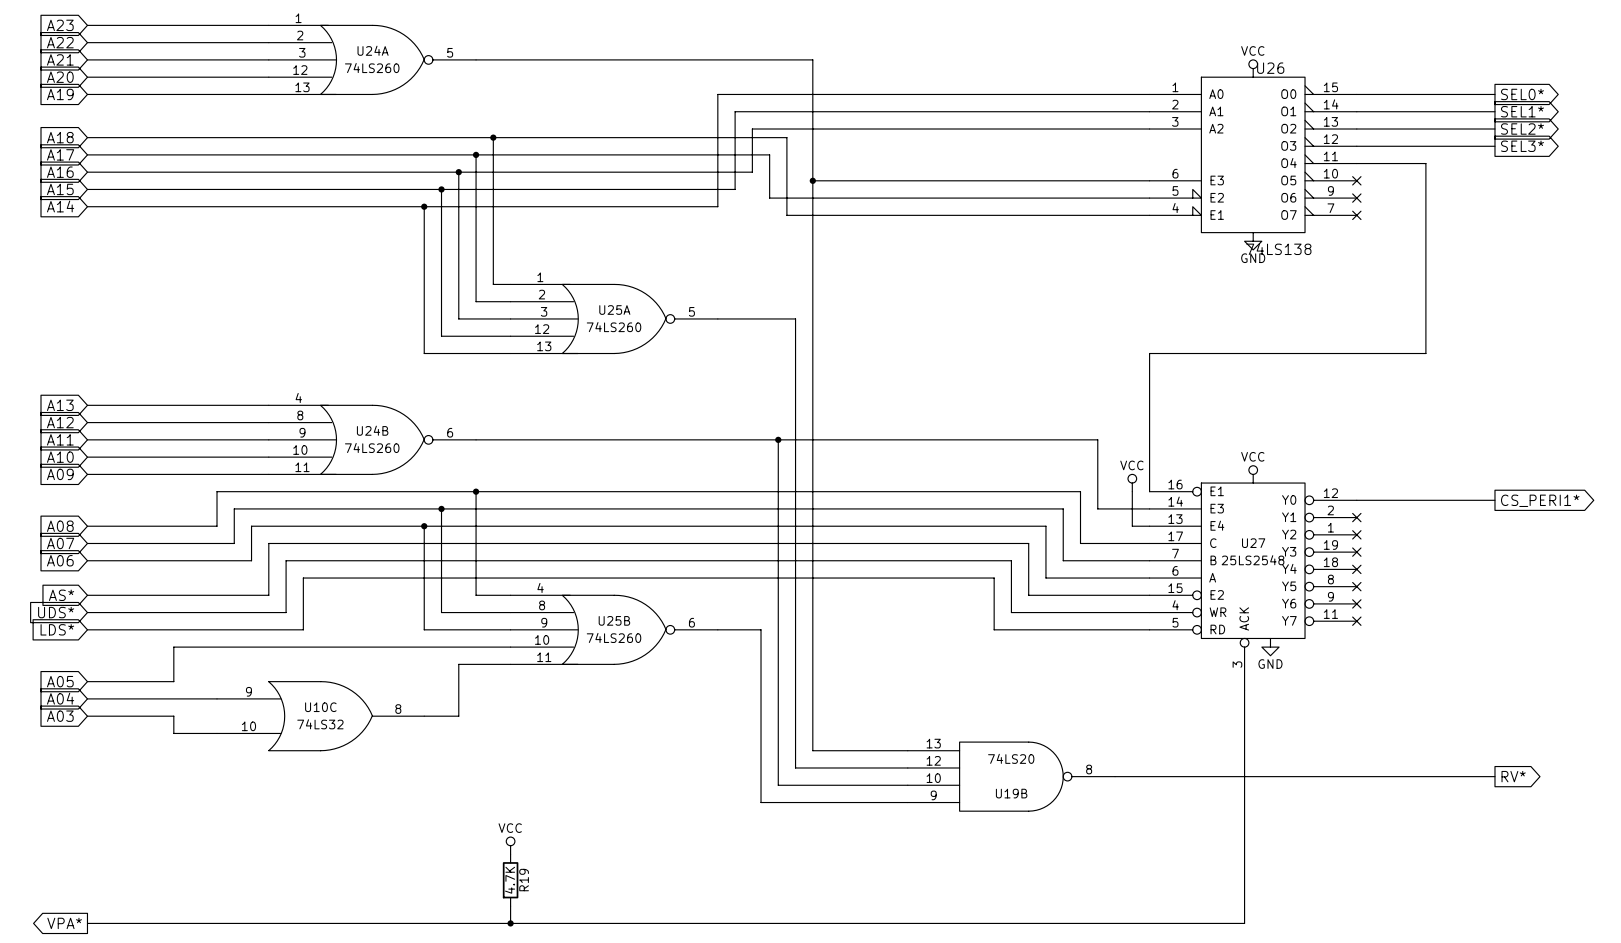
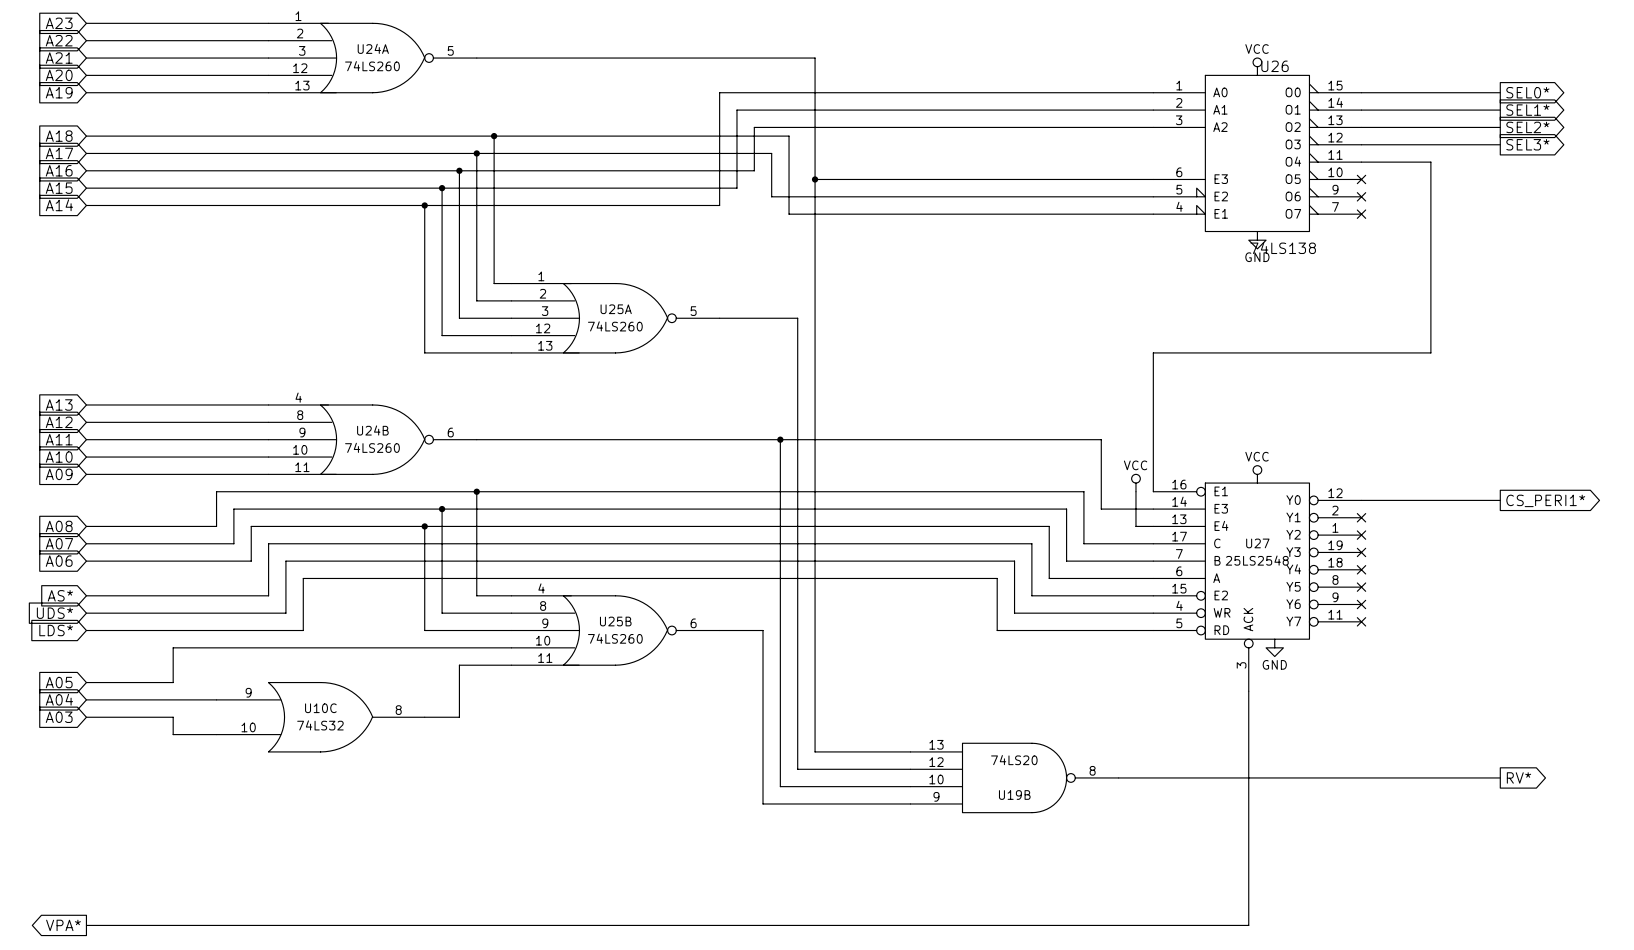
power symbol: VCC (510, 845) -> none
R19: 4.7K (510, 880) -> none
wire: (510, 906) (510, 923) -> none
junction: (510, 923) -> none

